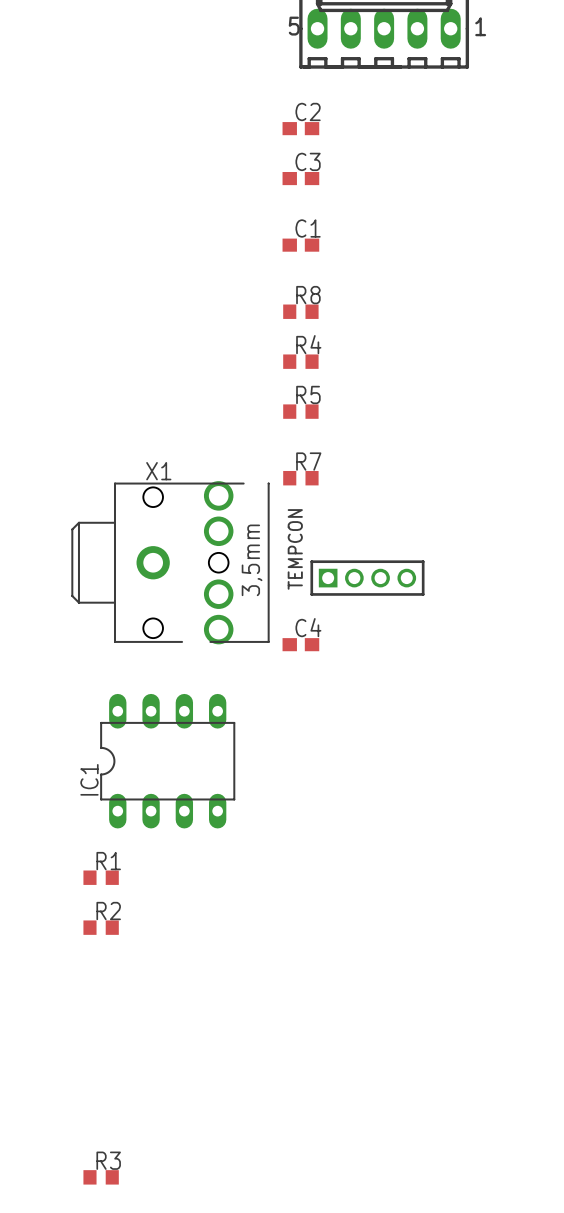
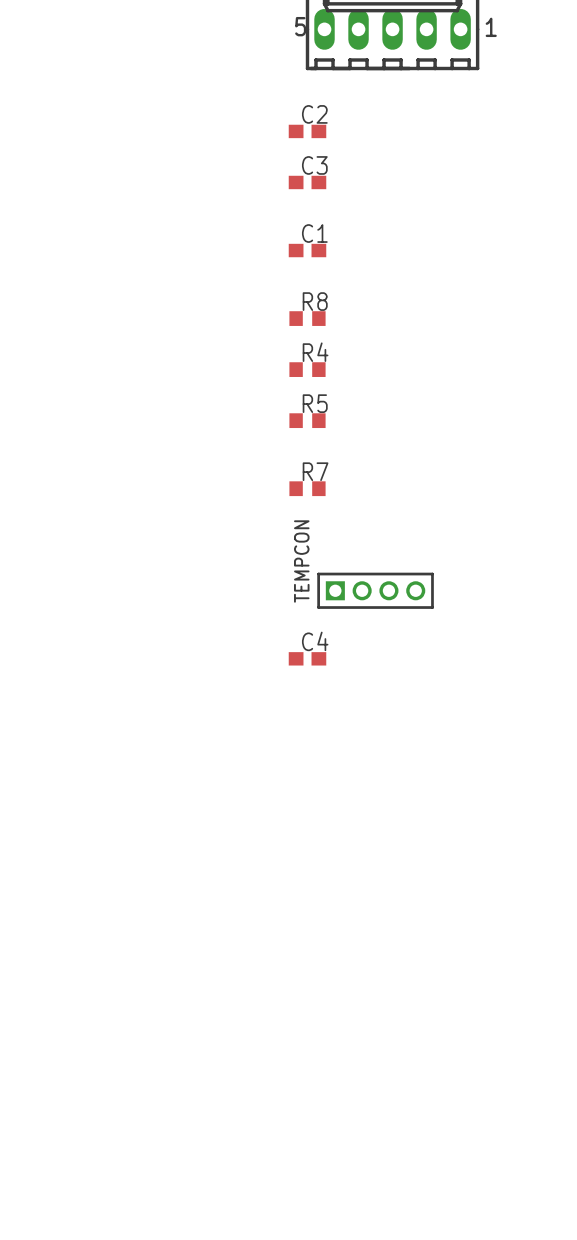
X1: (170, 562) -> none
IC1: (167, 761) -> none
R1: (101, 877) -> none
R2: (101, 927) -> none
R3: (101, 1177) -> none

